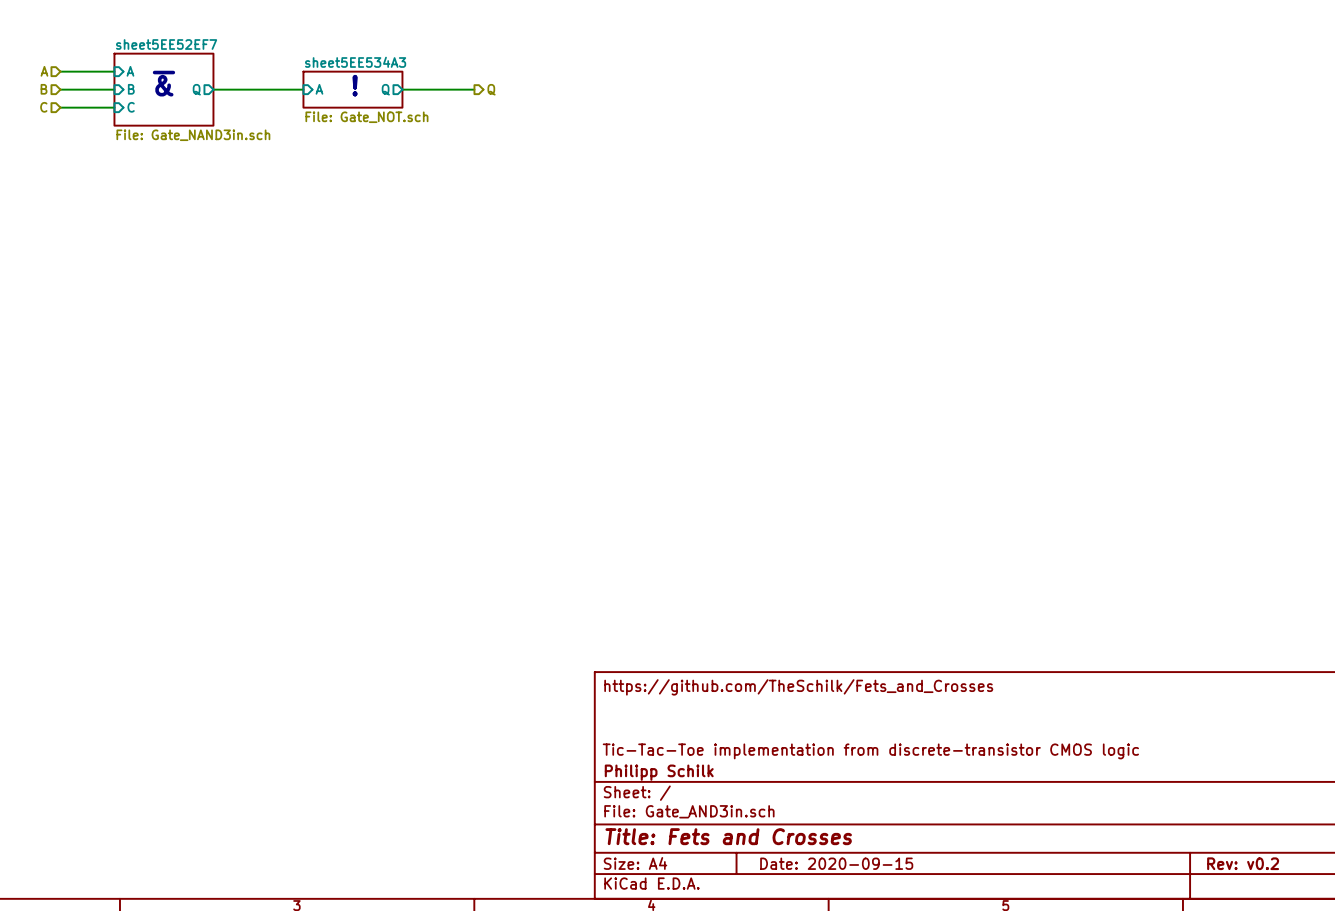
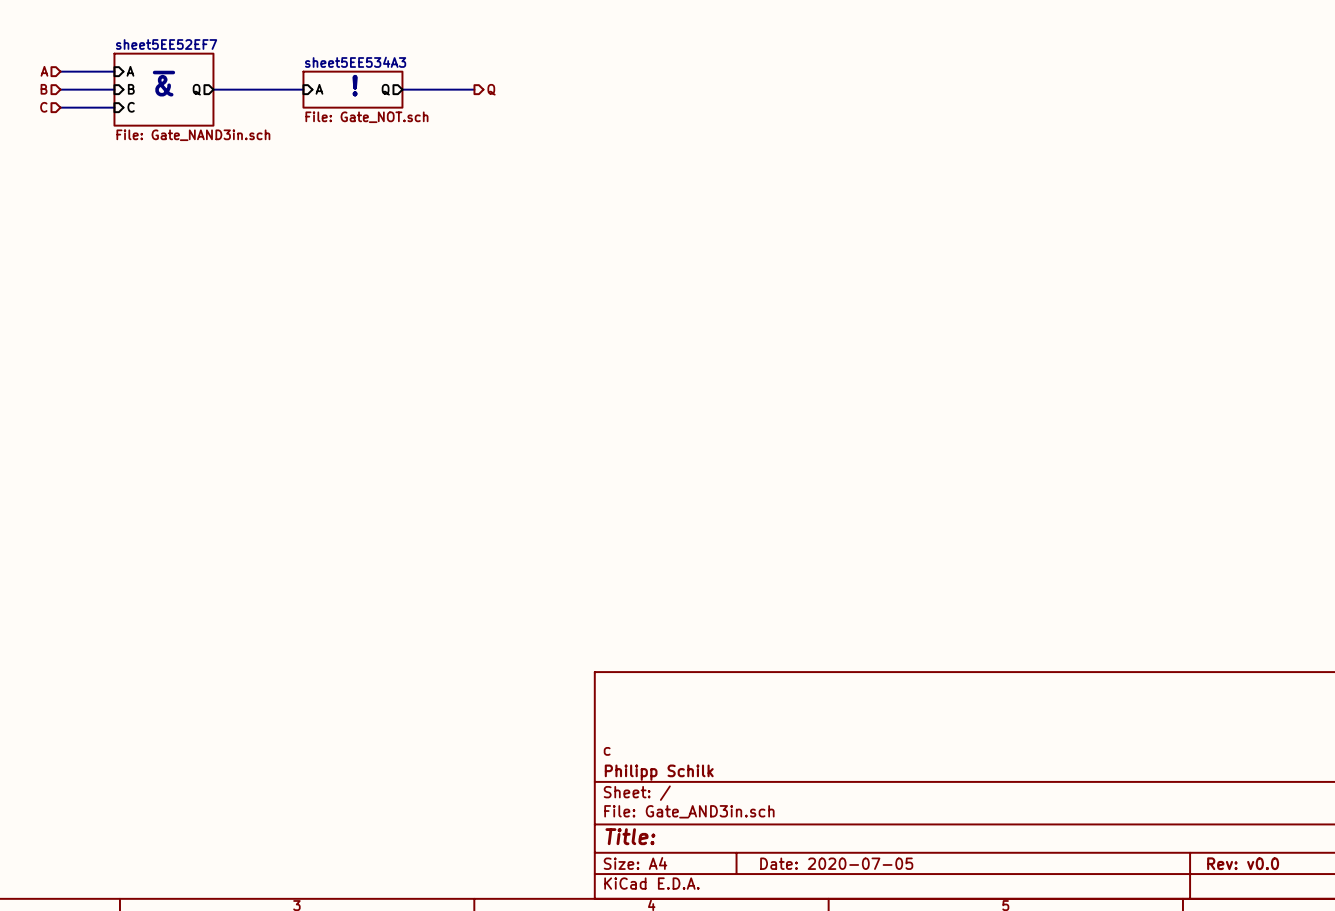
title block: https://github.com/TheSchilk/Fets_and_Crosses (798, 687) -> none
title block: Tic-Tac-Toe implementation from discrete-transistor CMOS logic (870, 751) -> c (607, 751)
title block: Title: Fets and Crosses (728, 836) -> Title: (630, 836)
title block: Date: 2020-09-15 (836, 863) -> Date: 2020-07-05 (836, 863)
title block: Rev: v0.2 (1243, 863) -> Rev: v0.0 (1243, 863)

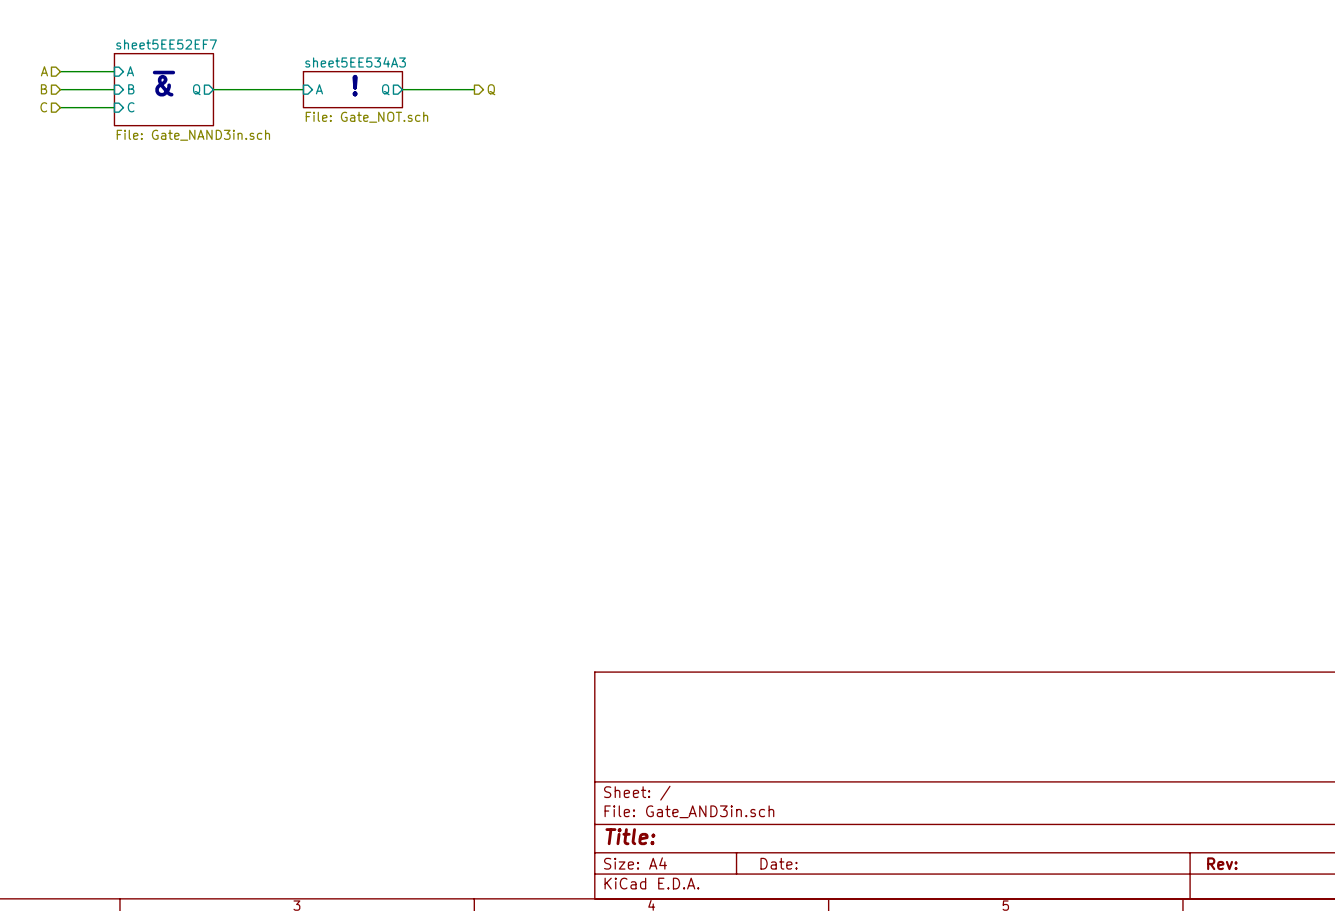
title block: c (607, 751) -> none
title block: Philipp Schilk (659, 772) -> none
title block: Date: 2020-07-05 (836, 863) -> Date: (779, 863)
title block: Rev: v0.0 (1243, 863) -> Rev: (1222, 863)

